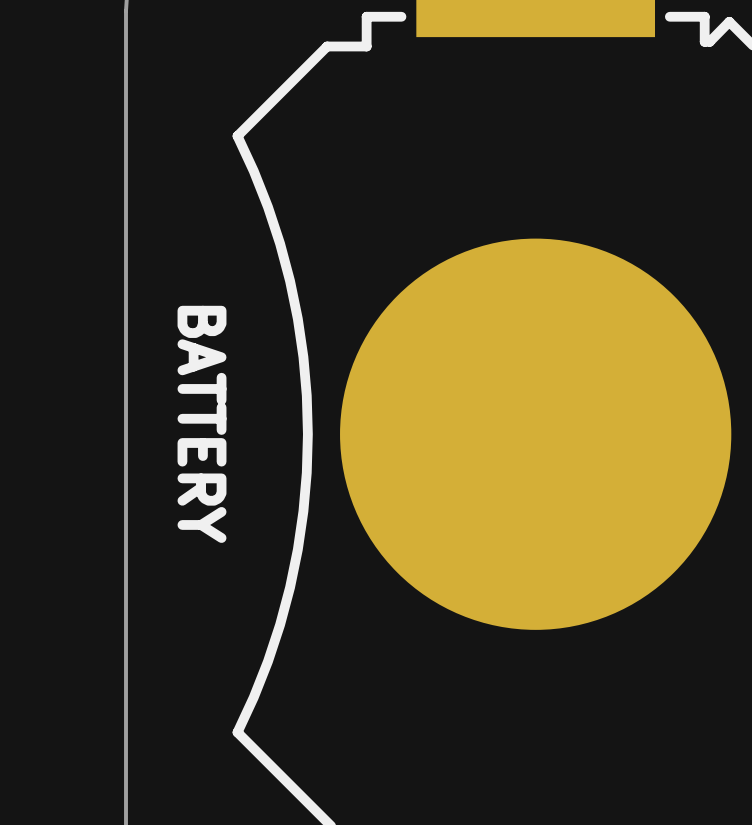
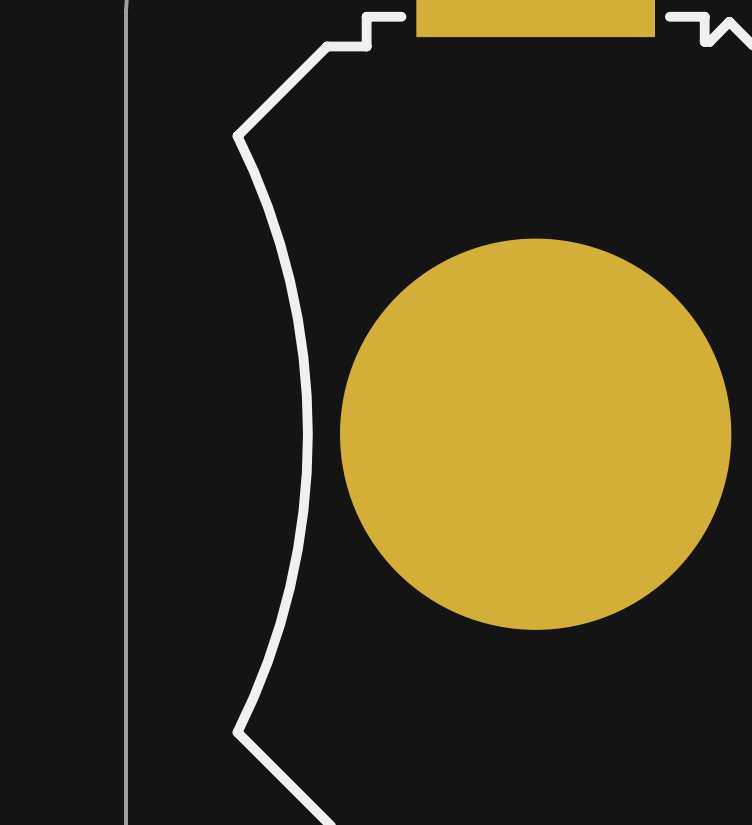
text: BATTERY (202, 424) -> none

